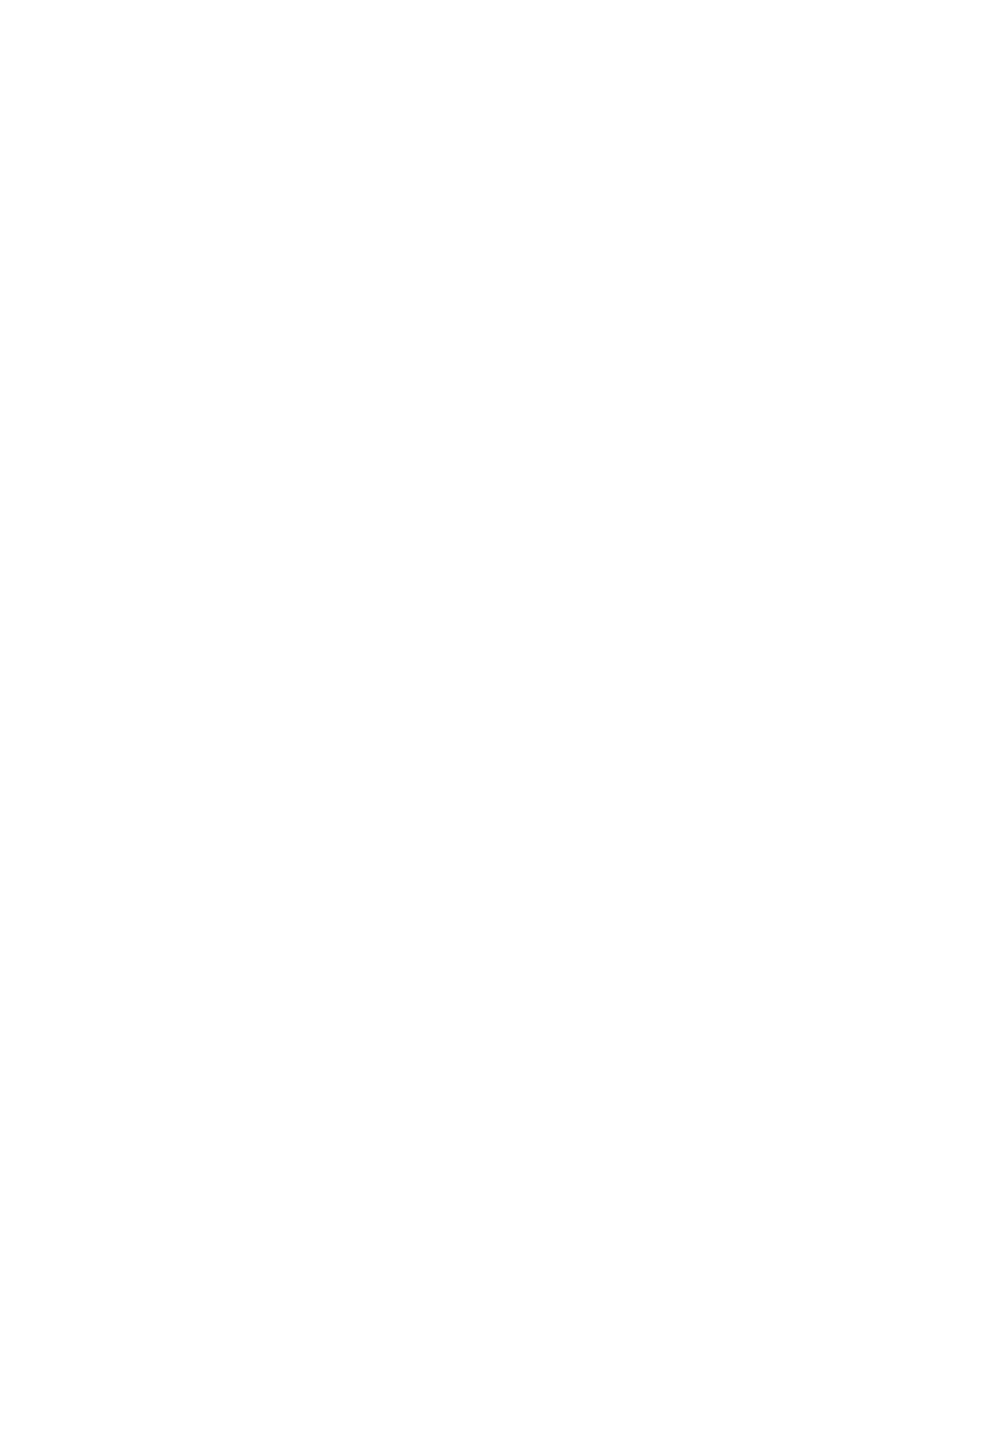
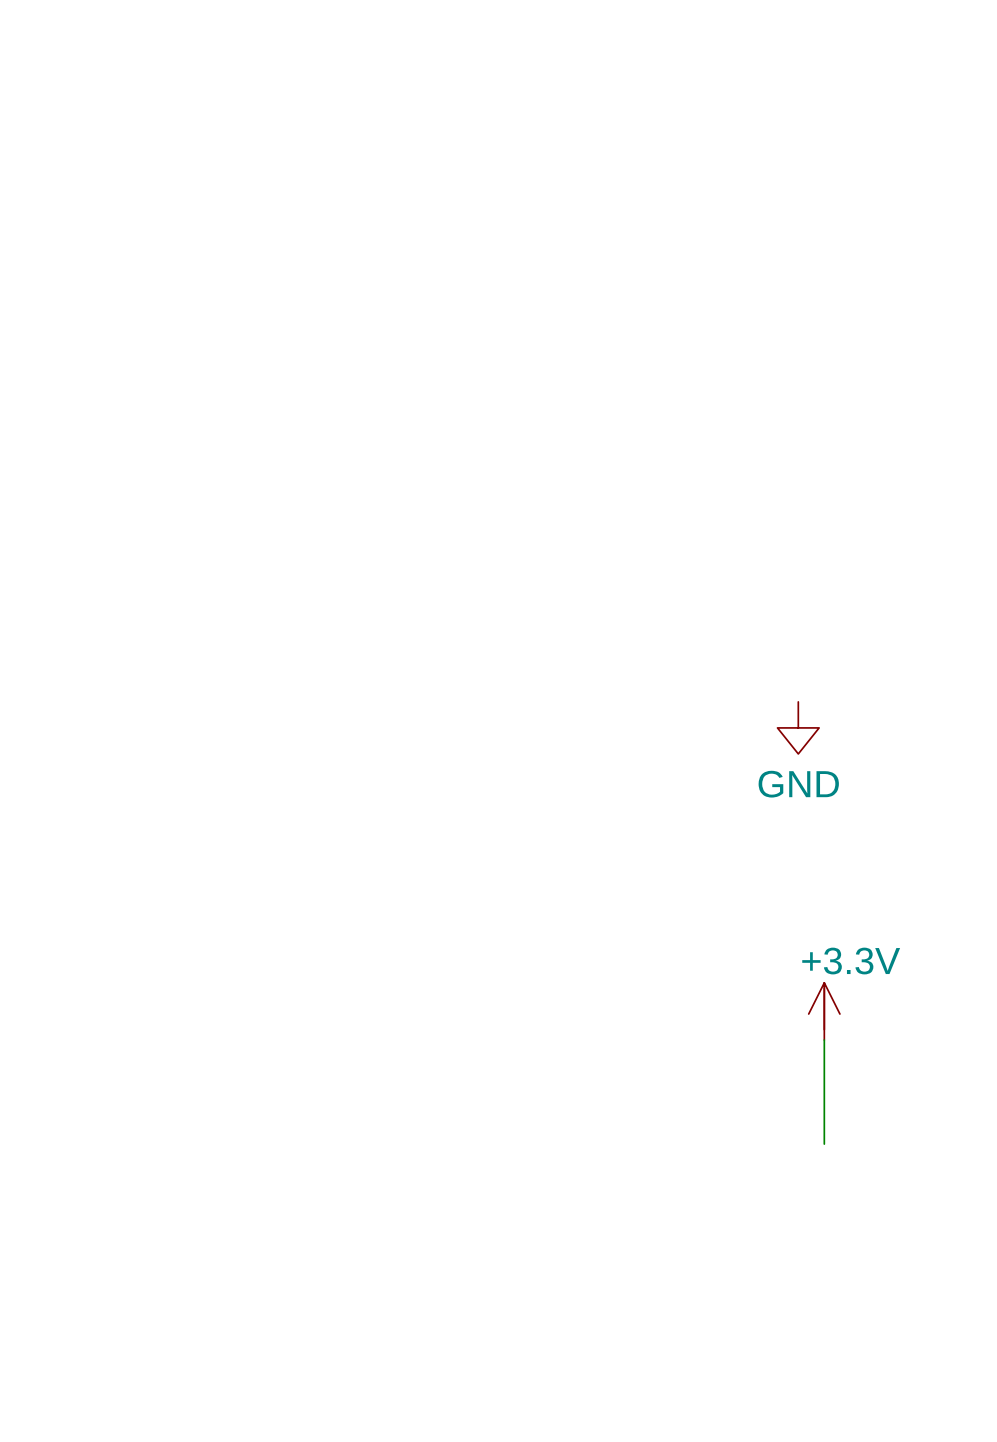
power symbol: none -> GND (798, 727)
power symbol: none -> +3.3V (824, 1011)
wire: none -> (824, 1040) (824, 1144)

